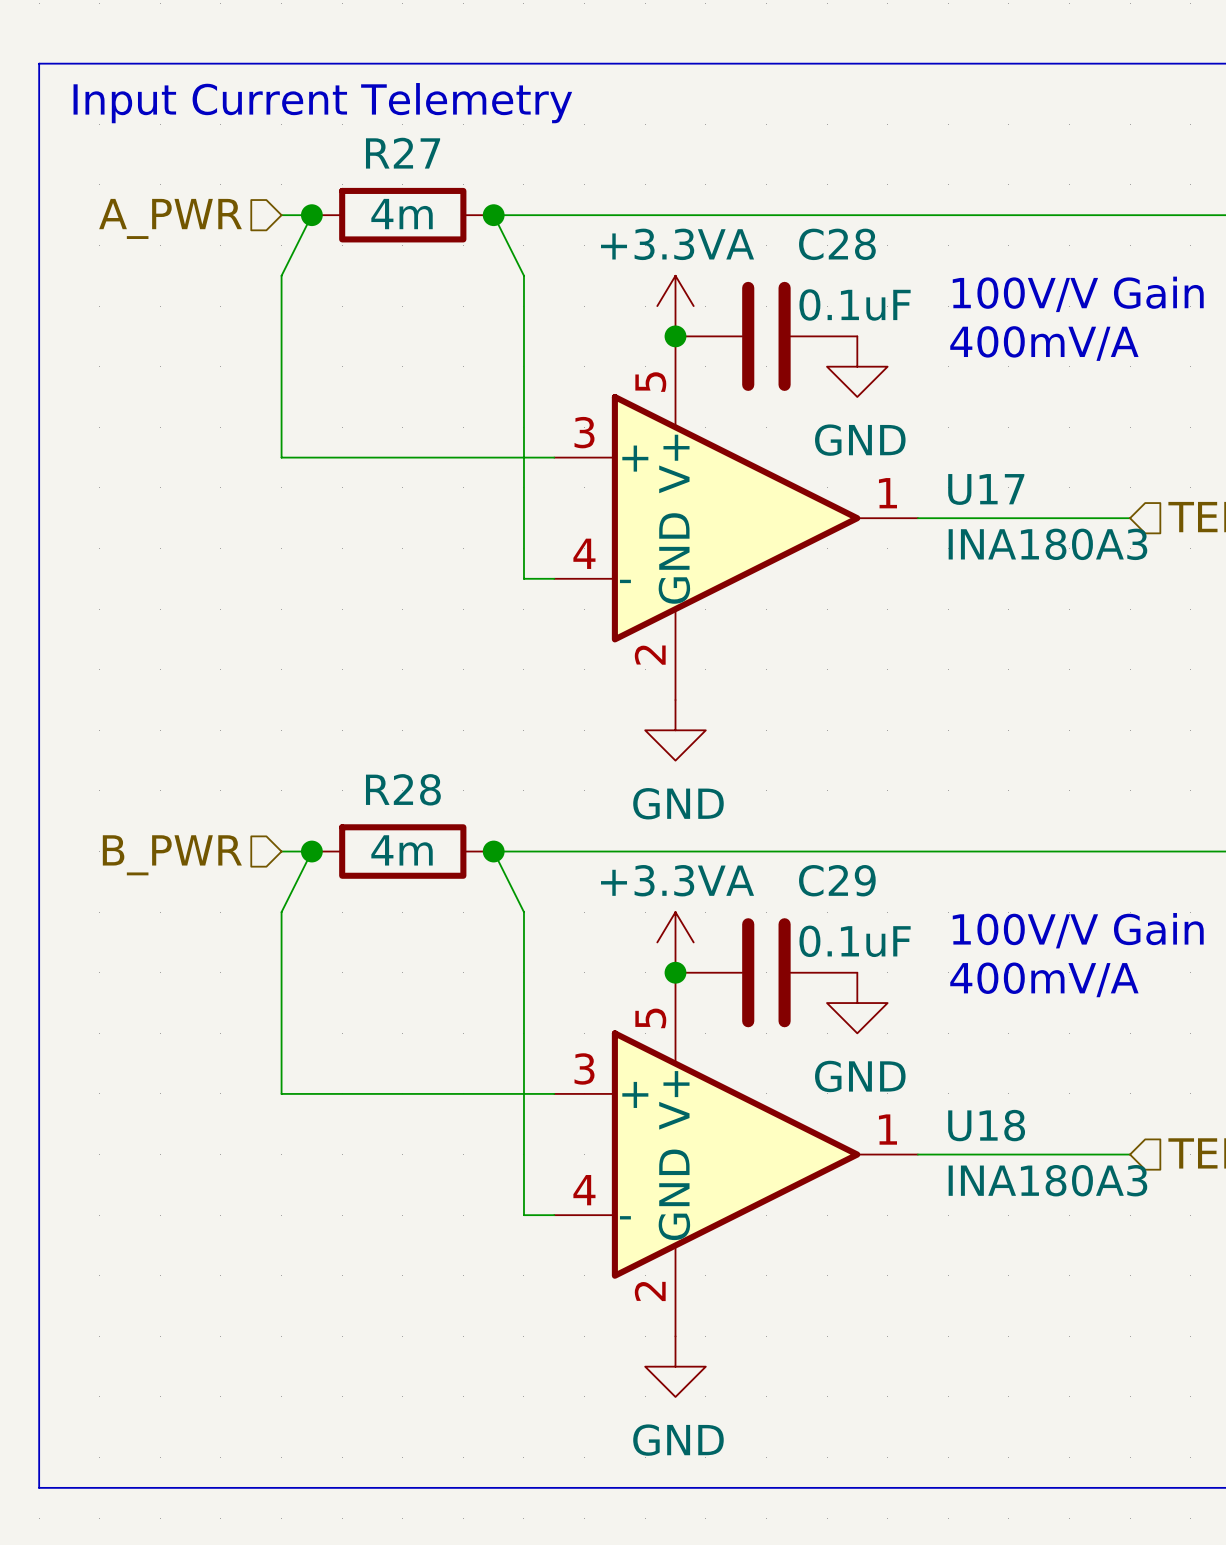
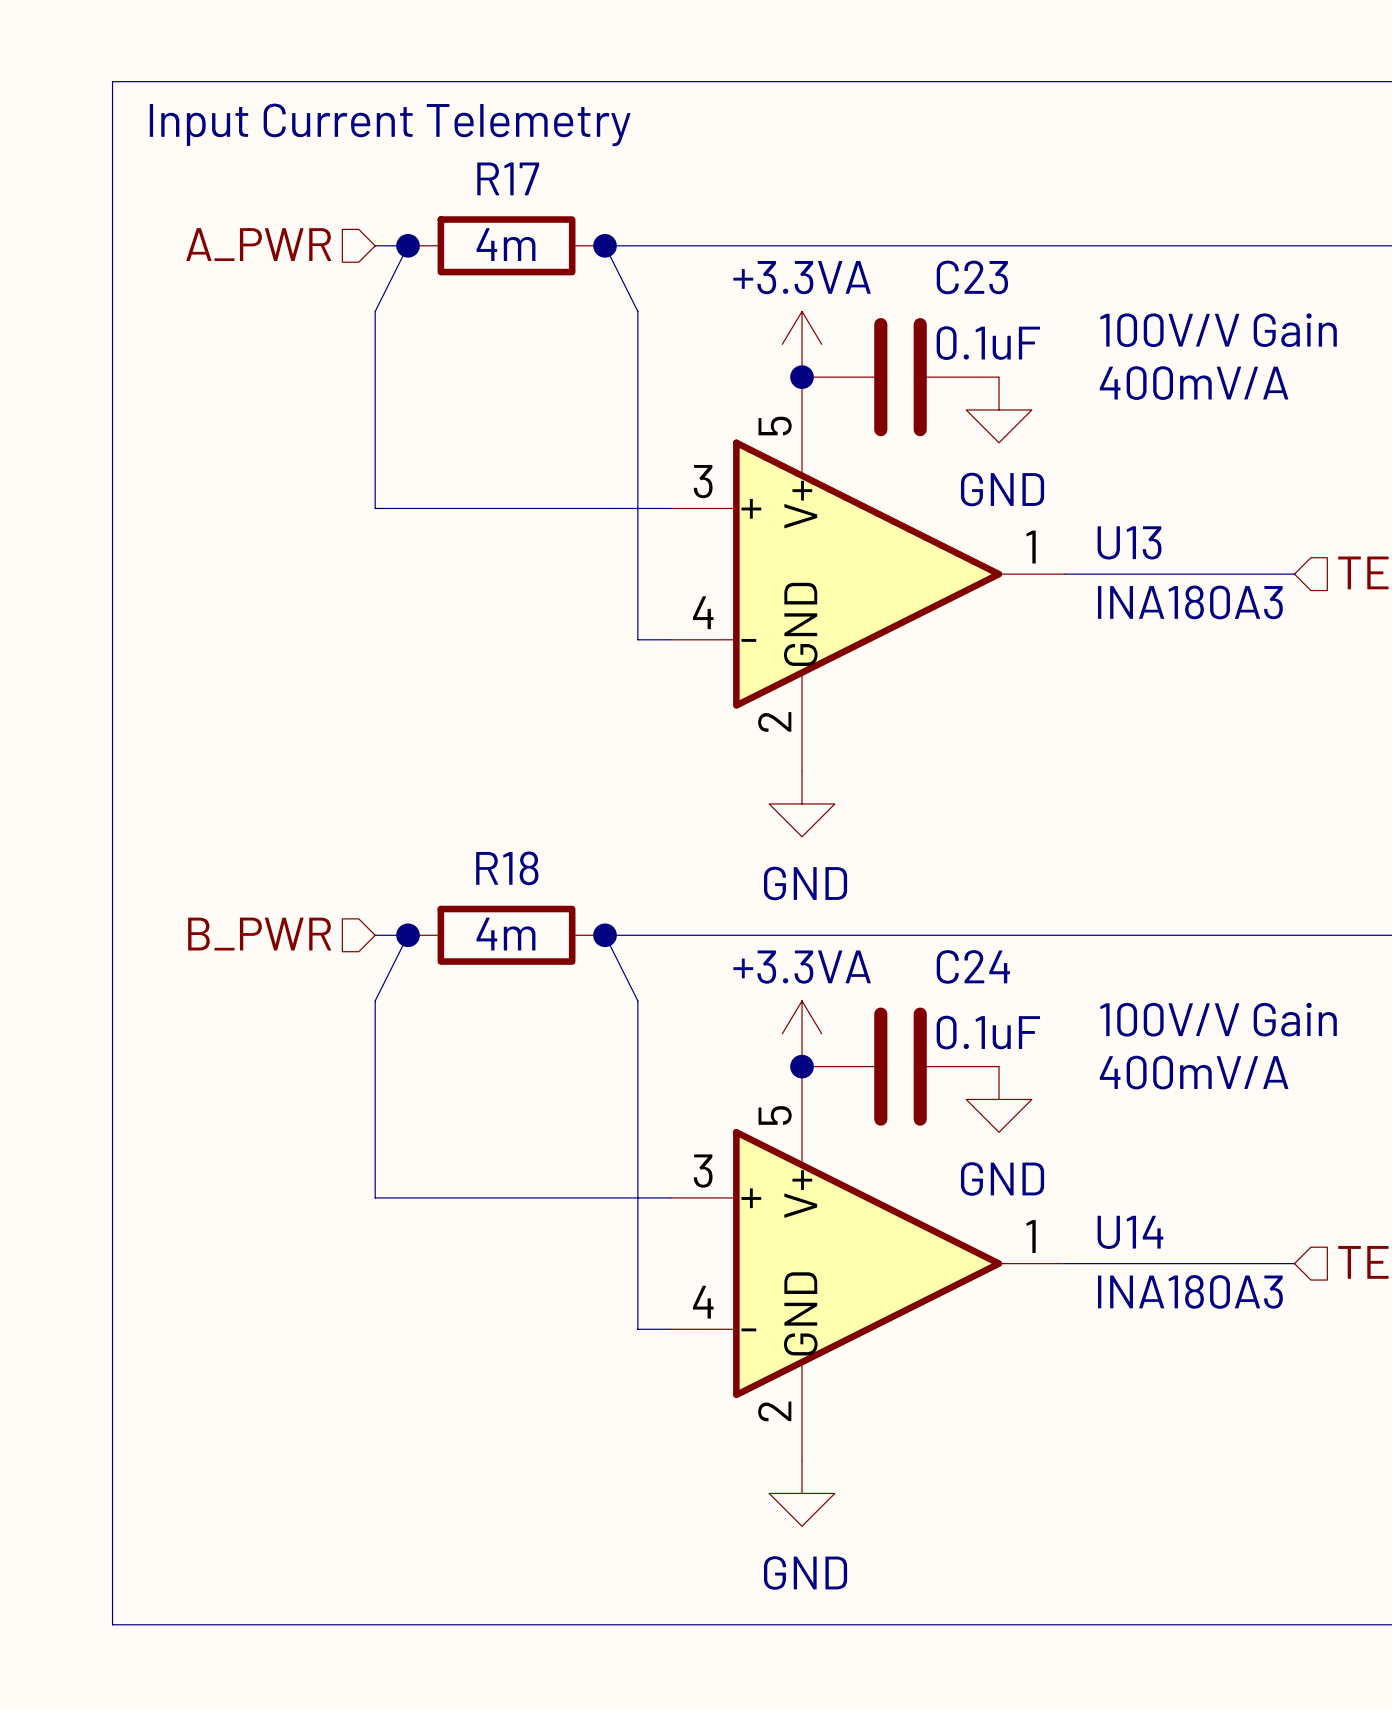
R27 name: R27 (403, 153) -> R17 (508, 178)
C28 name: C28 (837, 244) -> C23 (972, 277)
U17 name: U17 (986, 489) -> U13 (1129, 542)
R28 name: R28 (403, 789) -> R18 (507, 868)
C29 name: C29 (837, 880) -> C24 (973, 966)
U18 name: U18 (986, 1125) -> U14 (1130, 1232)

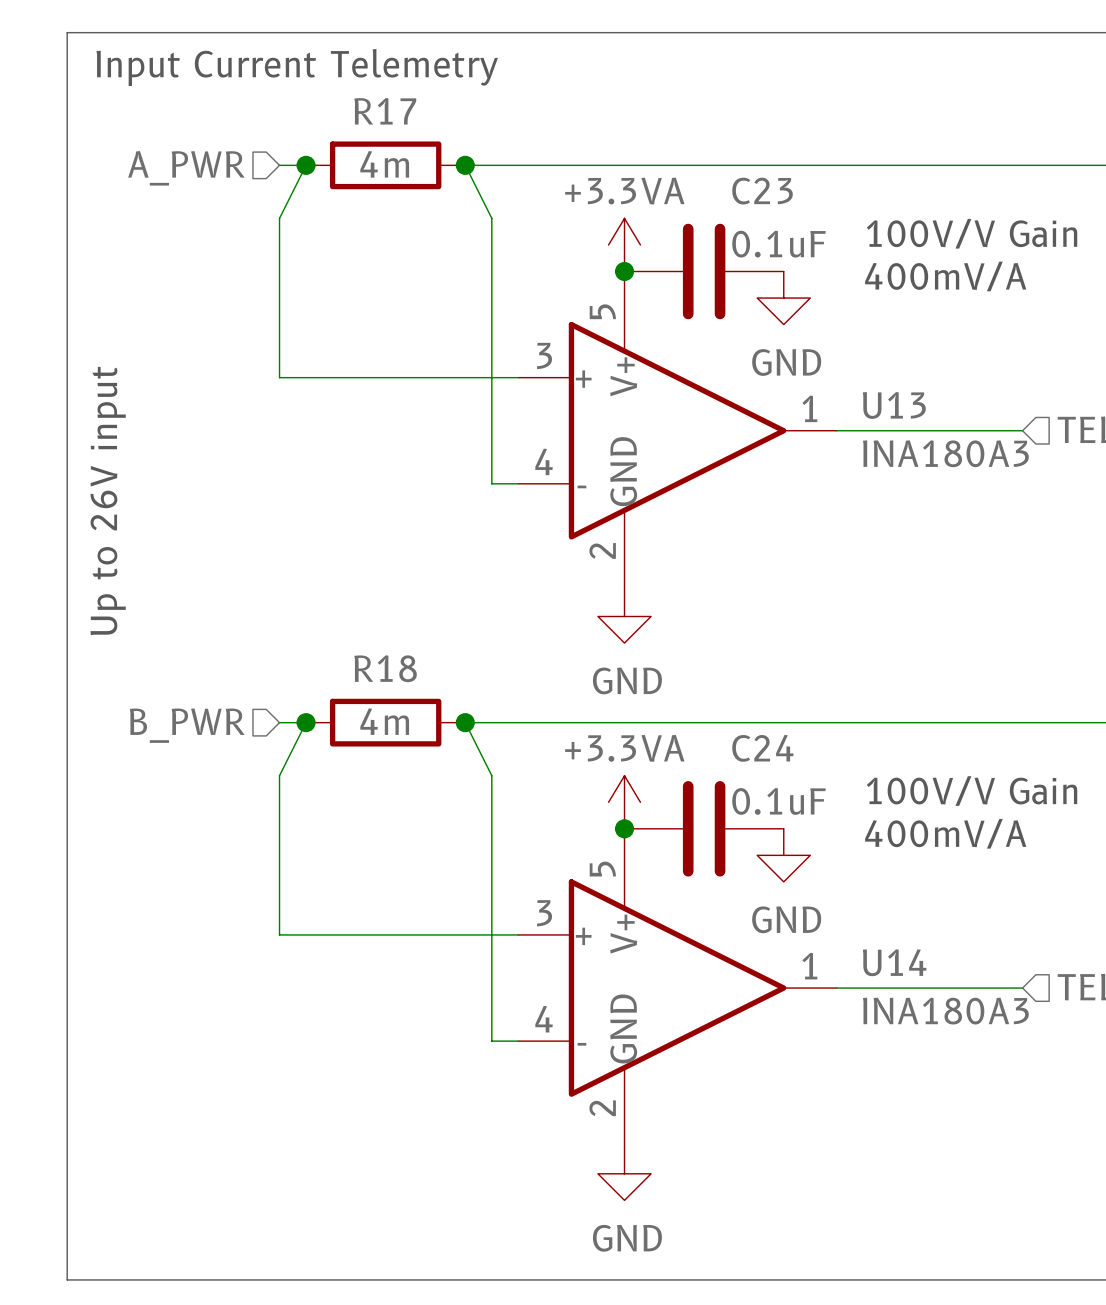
text: none -> Up to 26V input (108, 500)

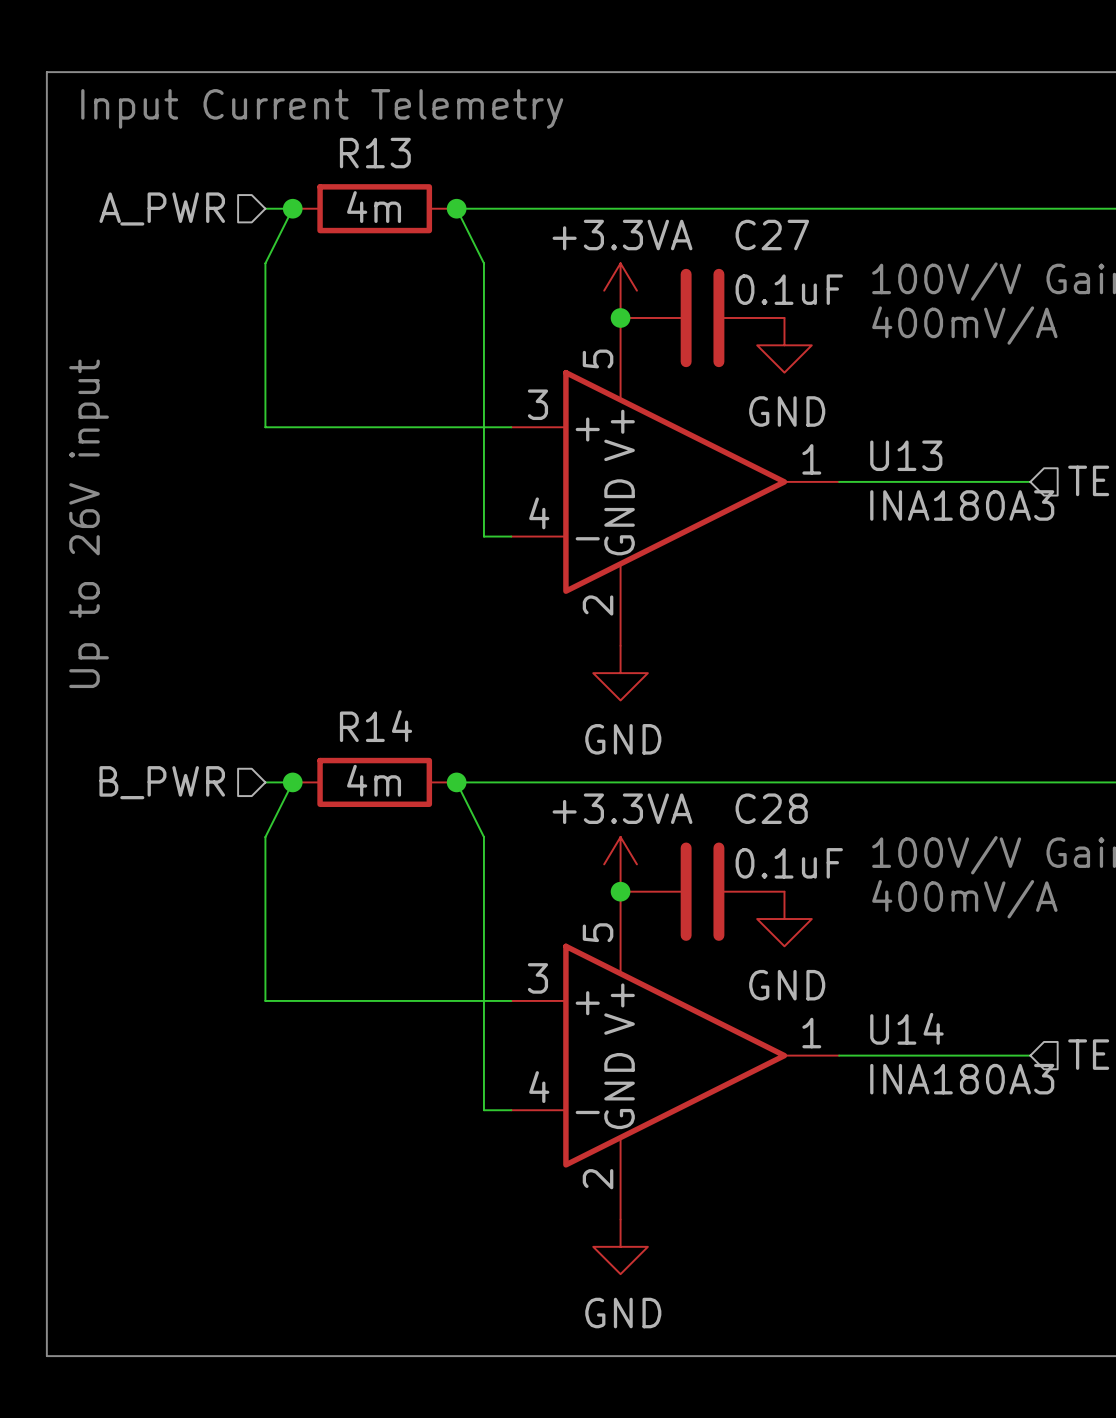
R17 name: R17 (385, 111) -> R13 (375, 153)
C23 name: C23 (762, 191) -> C27 (772, 235)
R18 name: R18 (385, 668) -> R14 (376, 726)
C24 name: C24 (762, 748) -> C28 (771, 808)

